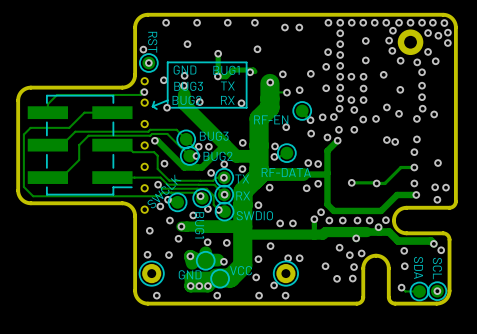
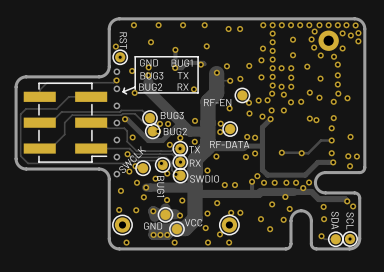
via: (435, 61) -> none
via: (199, 102) -> none
via: (349, 255) -> none
via: (352, 278) -> none

